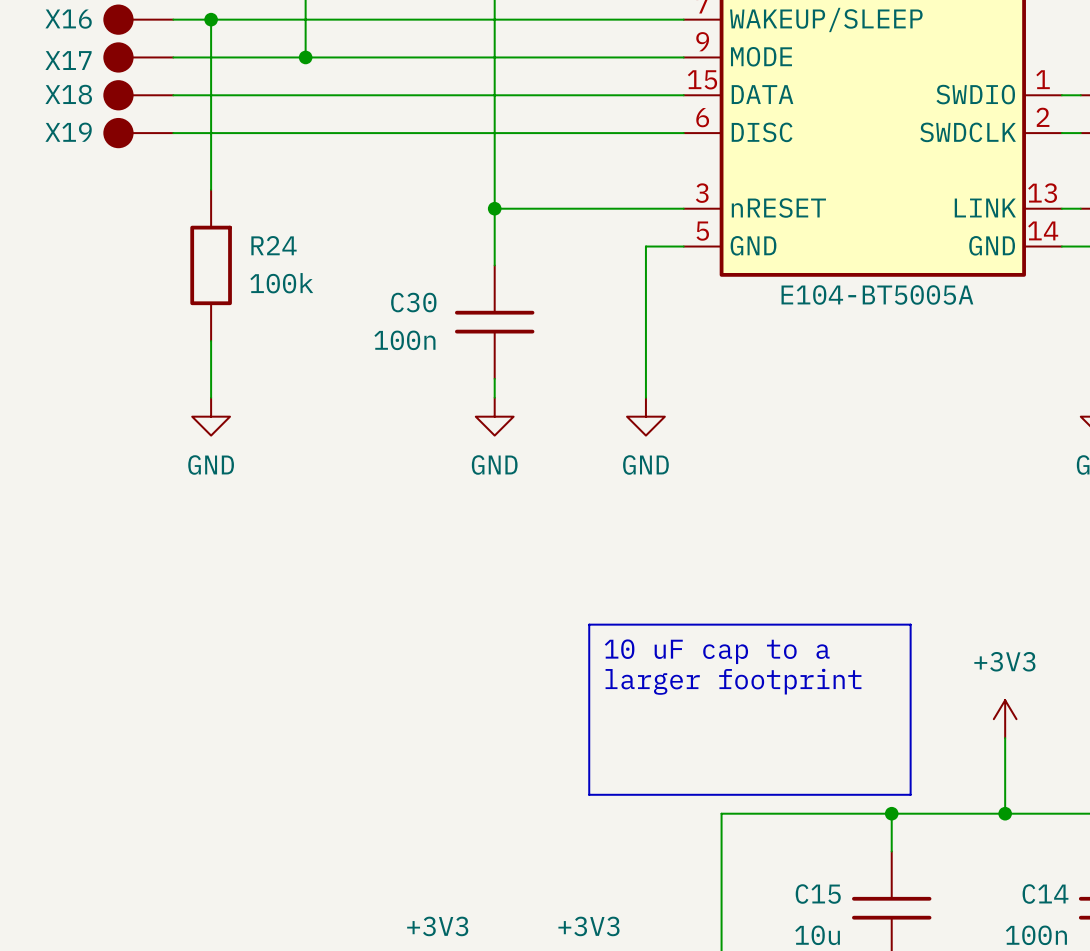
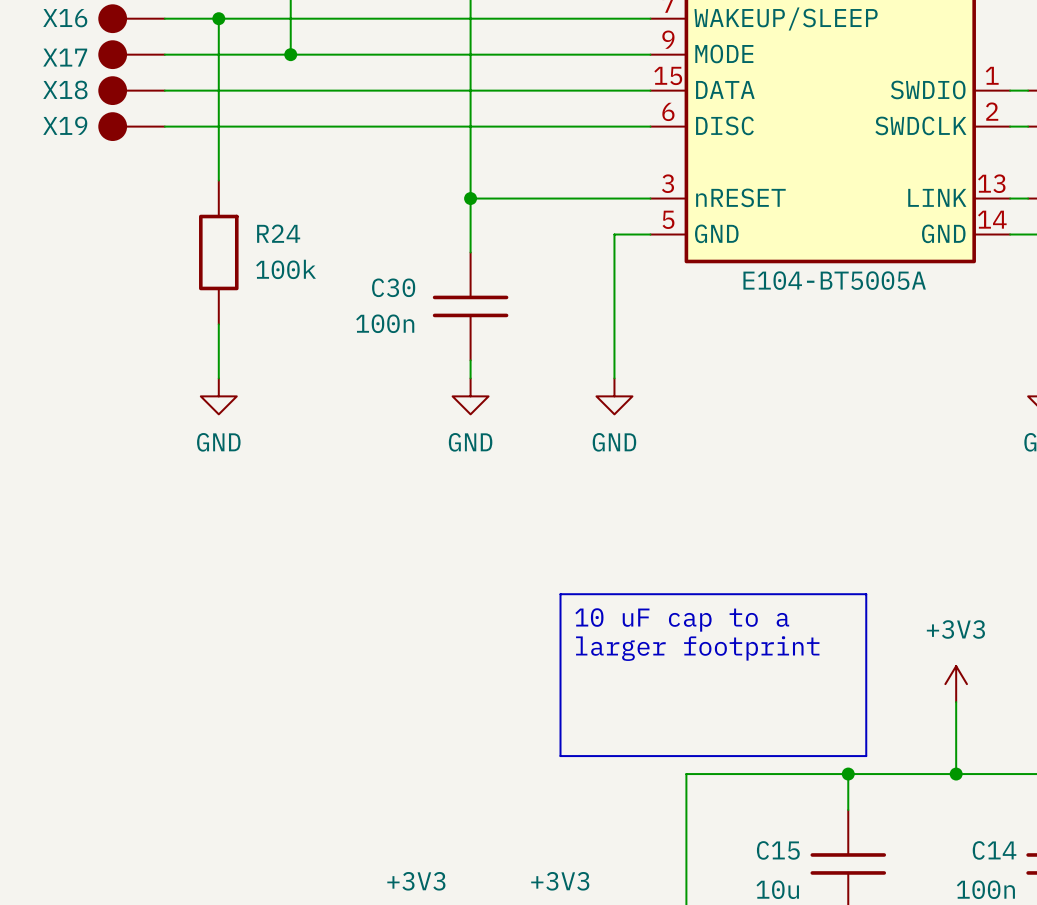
wire: (211, 19) (211, 189) -> (218, 18) (218, 180)
junction position: (211, 19) -> (218, 18)
R24 position: (211, 265) -> (218, 252)
wire: (211, 341) (211, 397) -> (218, 324) (218, 378)
power symbol position: GND (211, 416) -> GND (218, 396)

